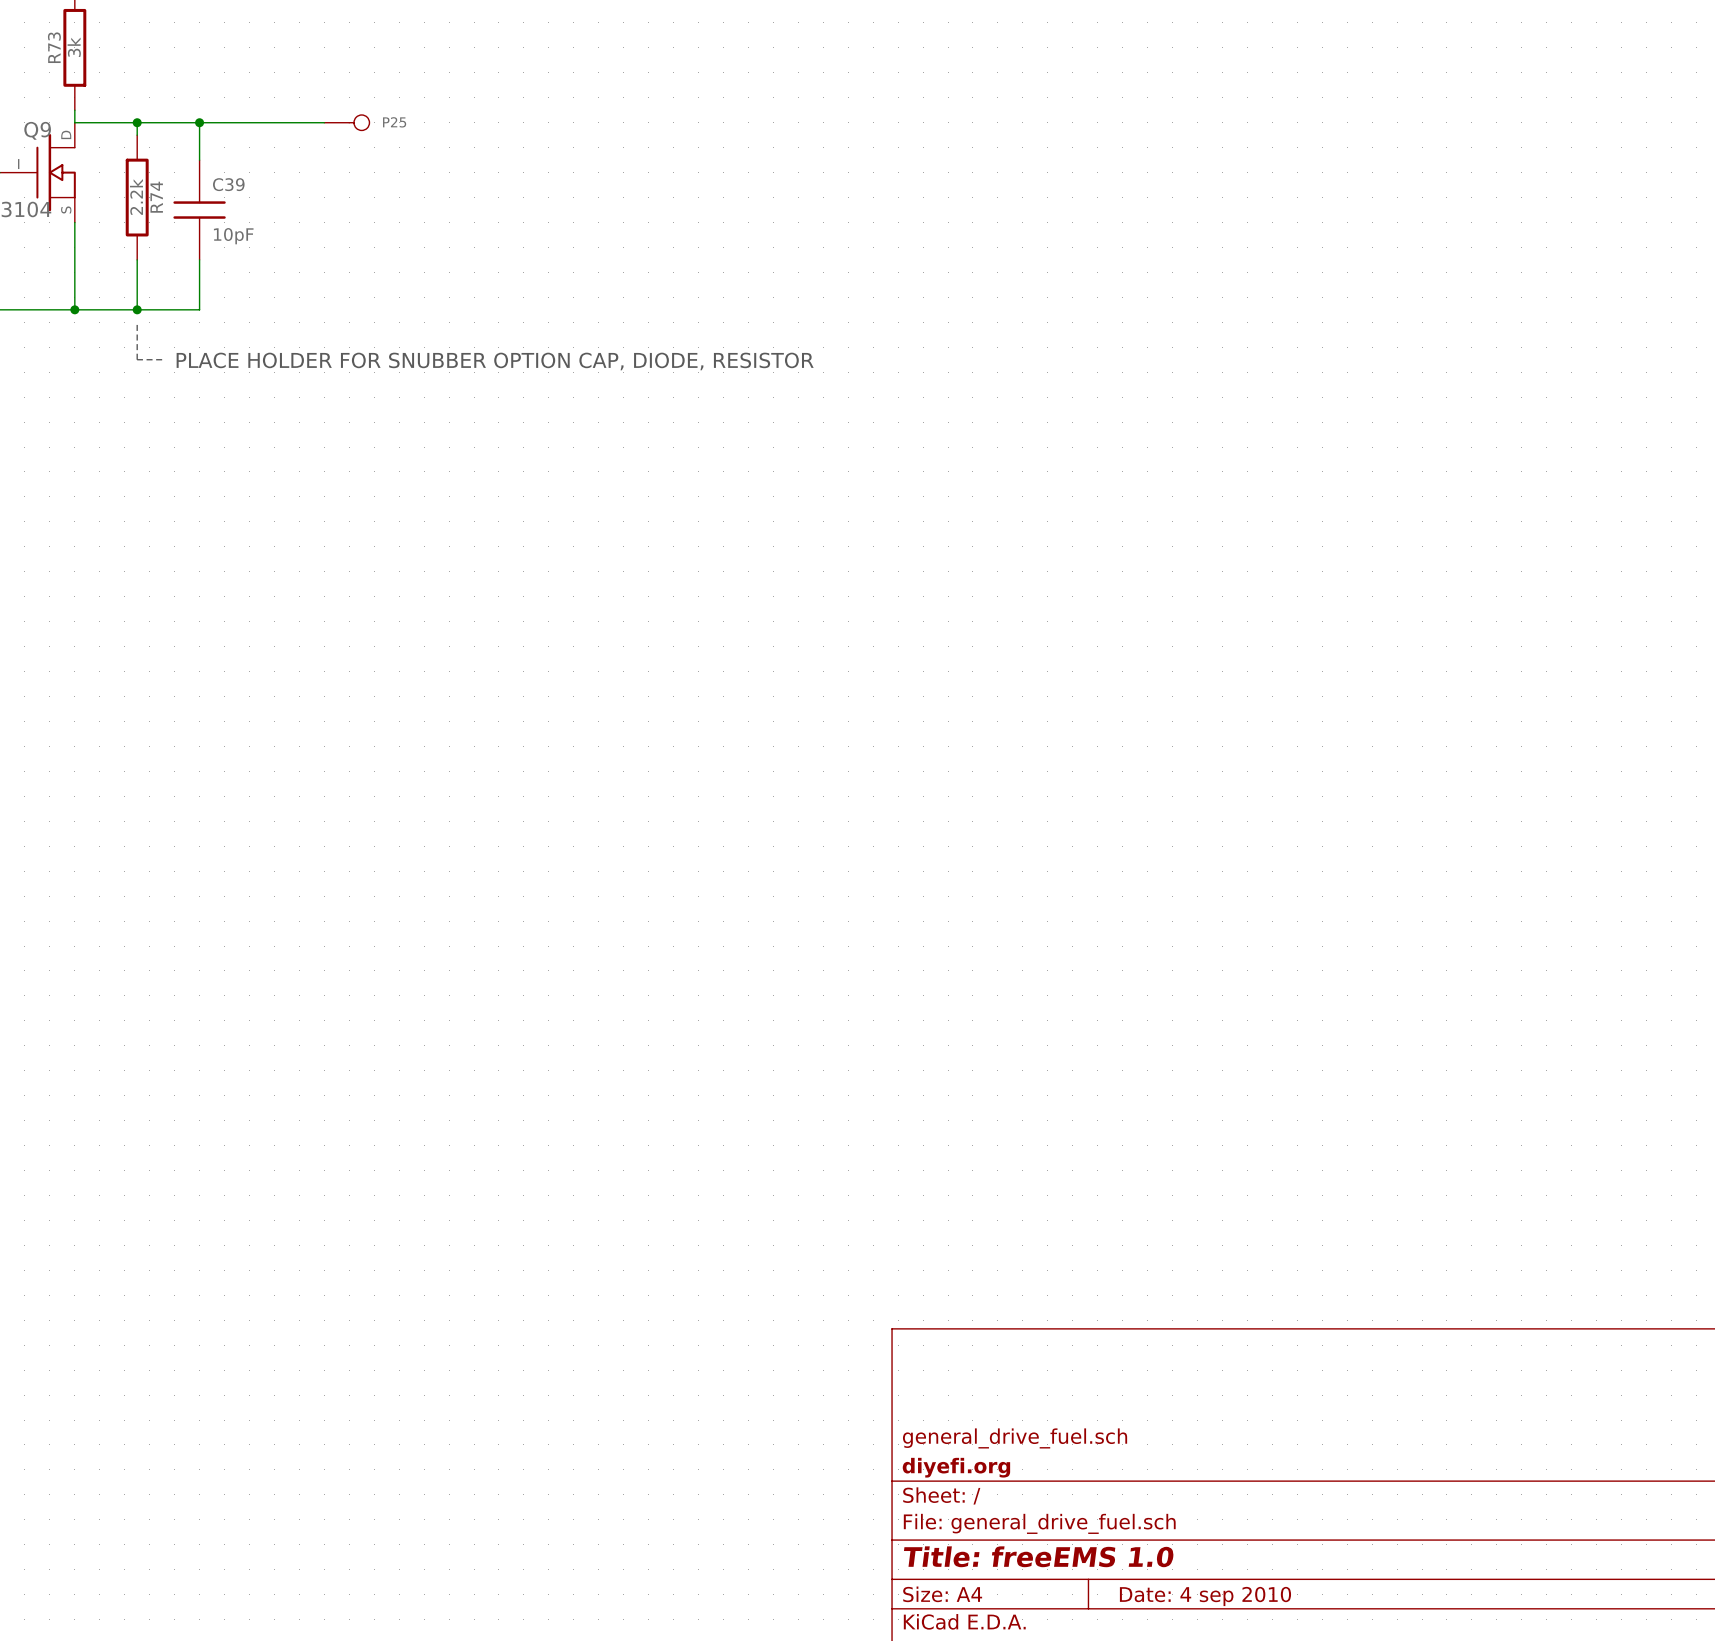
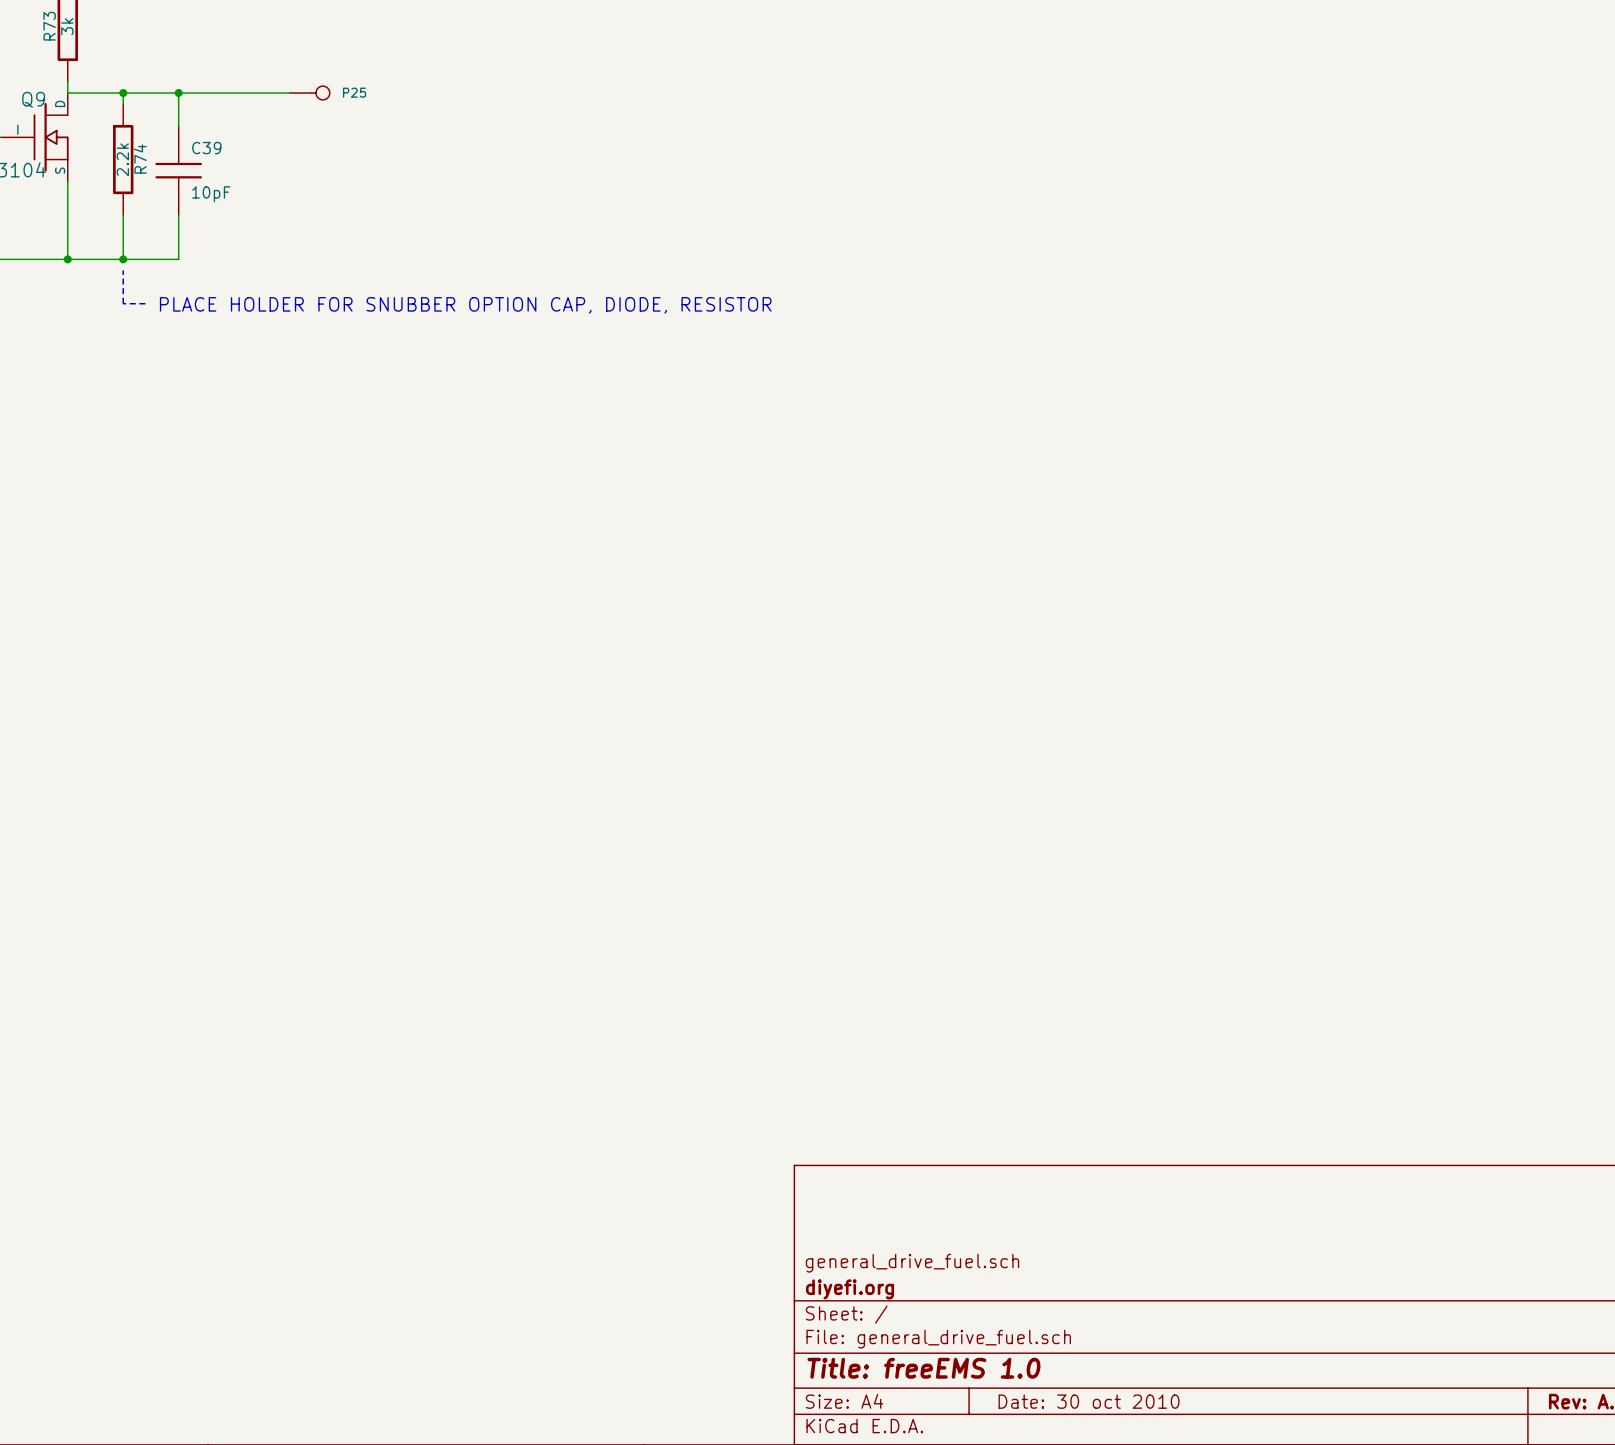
title block: Date: 4 sep 2010 (1205, 1596) -> Date: 30 oct 2010 (1089, 1401)

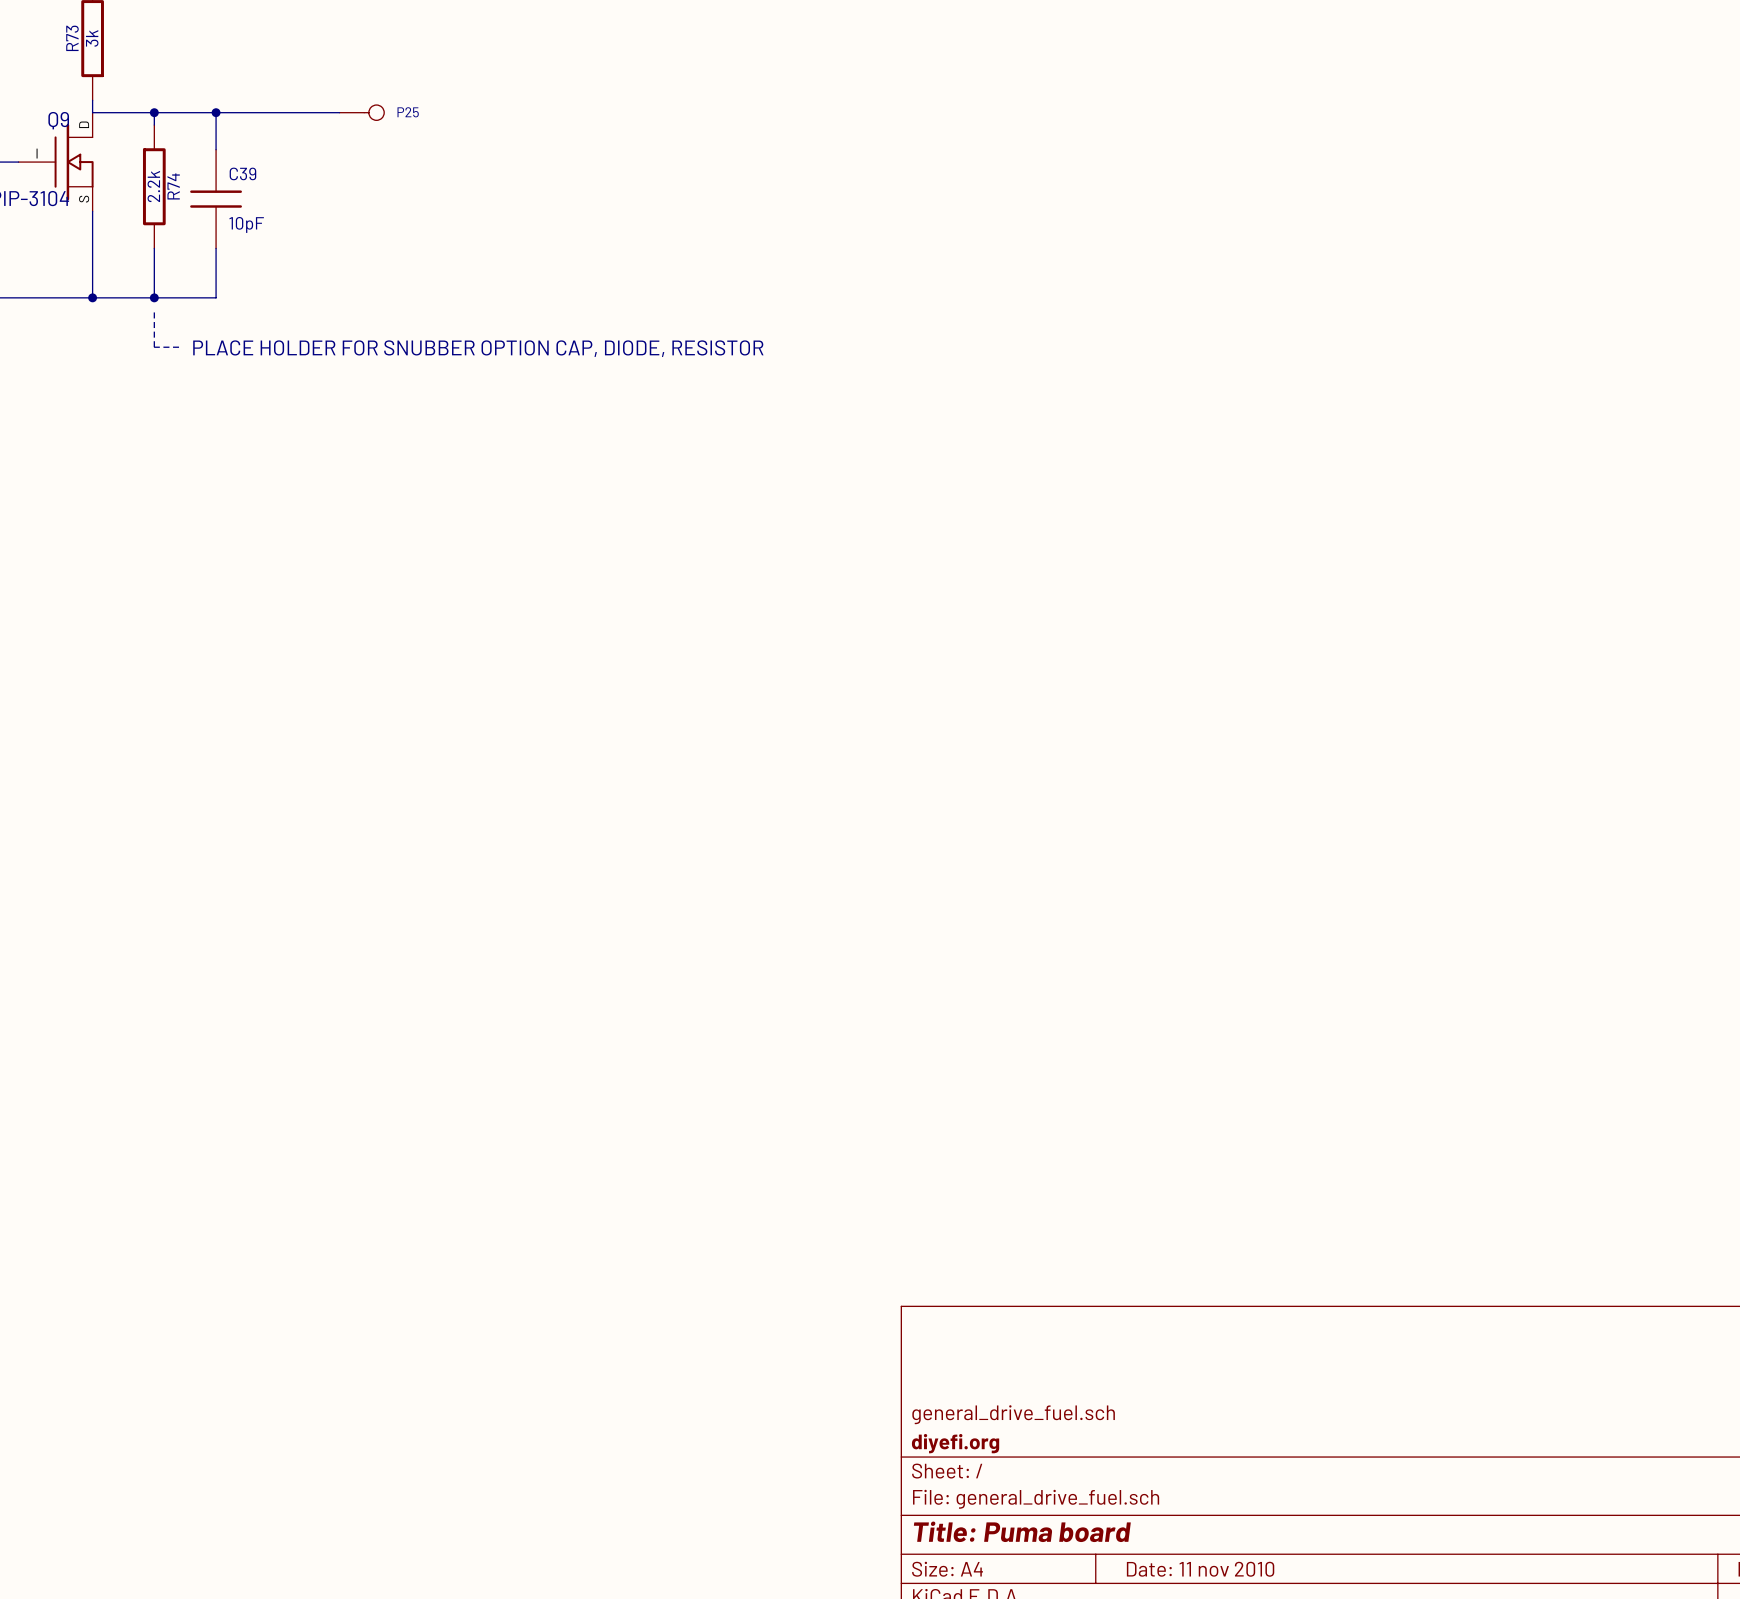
title block: Title: freeEMS 1.0 (924, 1368) -> Title: Puma board (1022, 1531)
title block: Date: 30 oct 2010 (1089, 1401) -> Date: 11 nov 2010 (1200, 1569)

